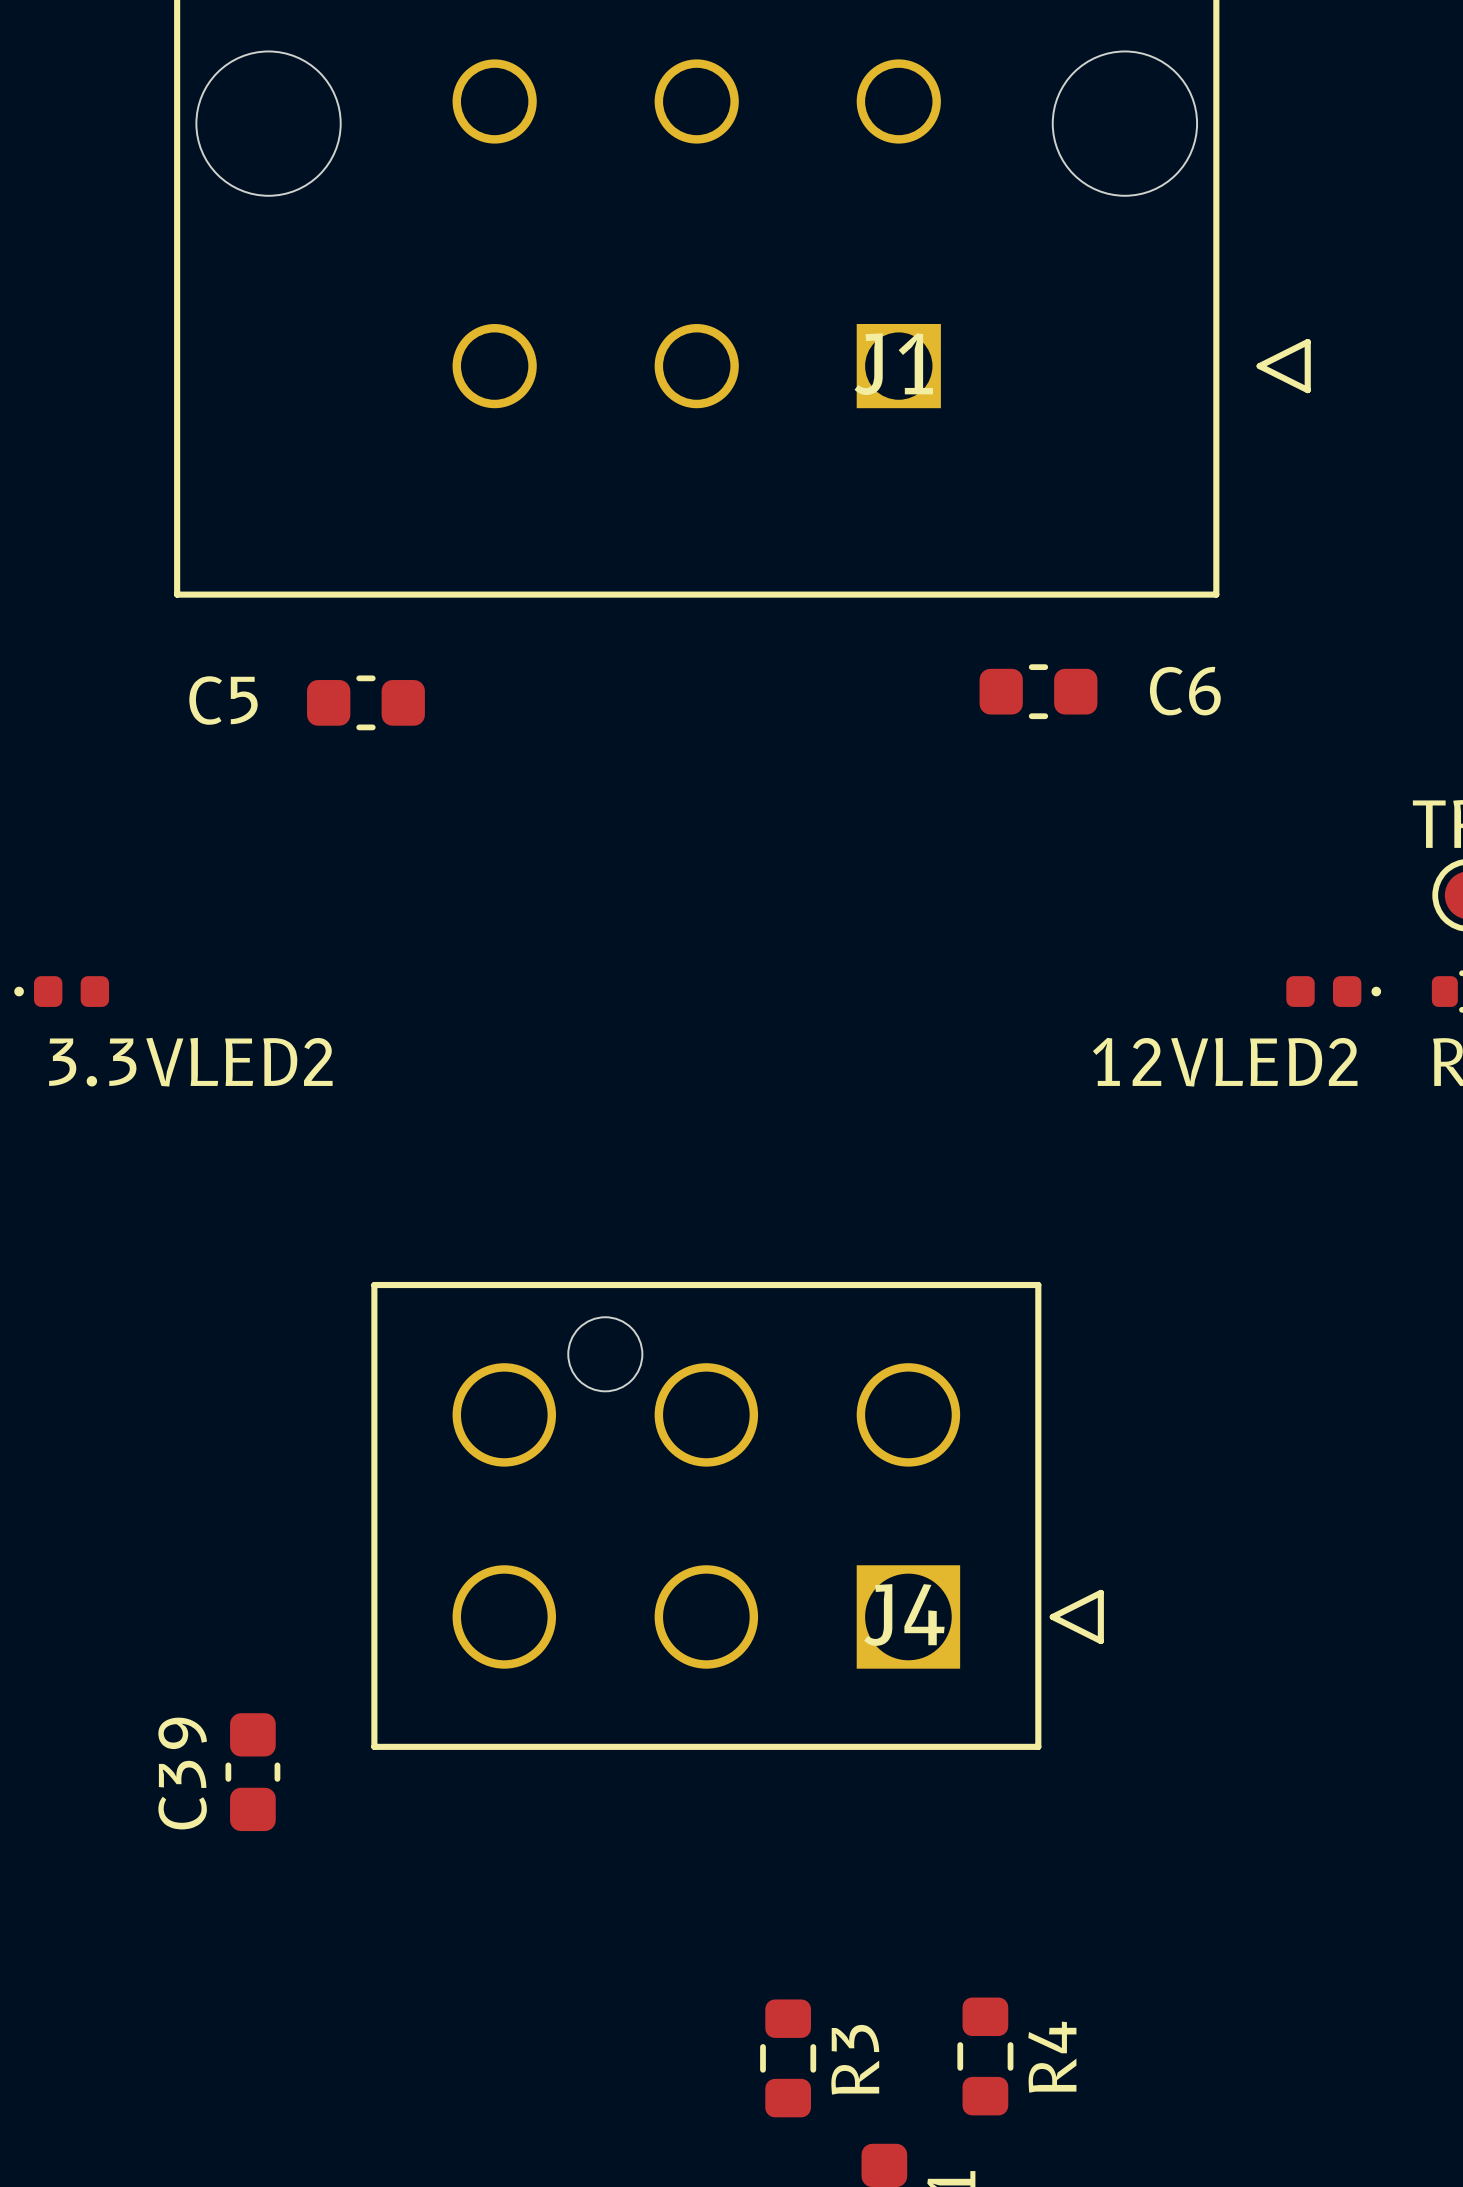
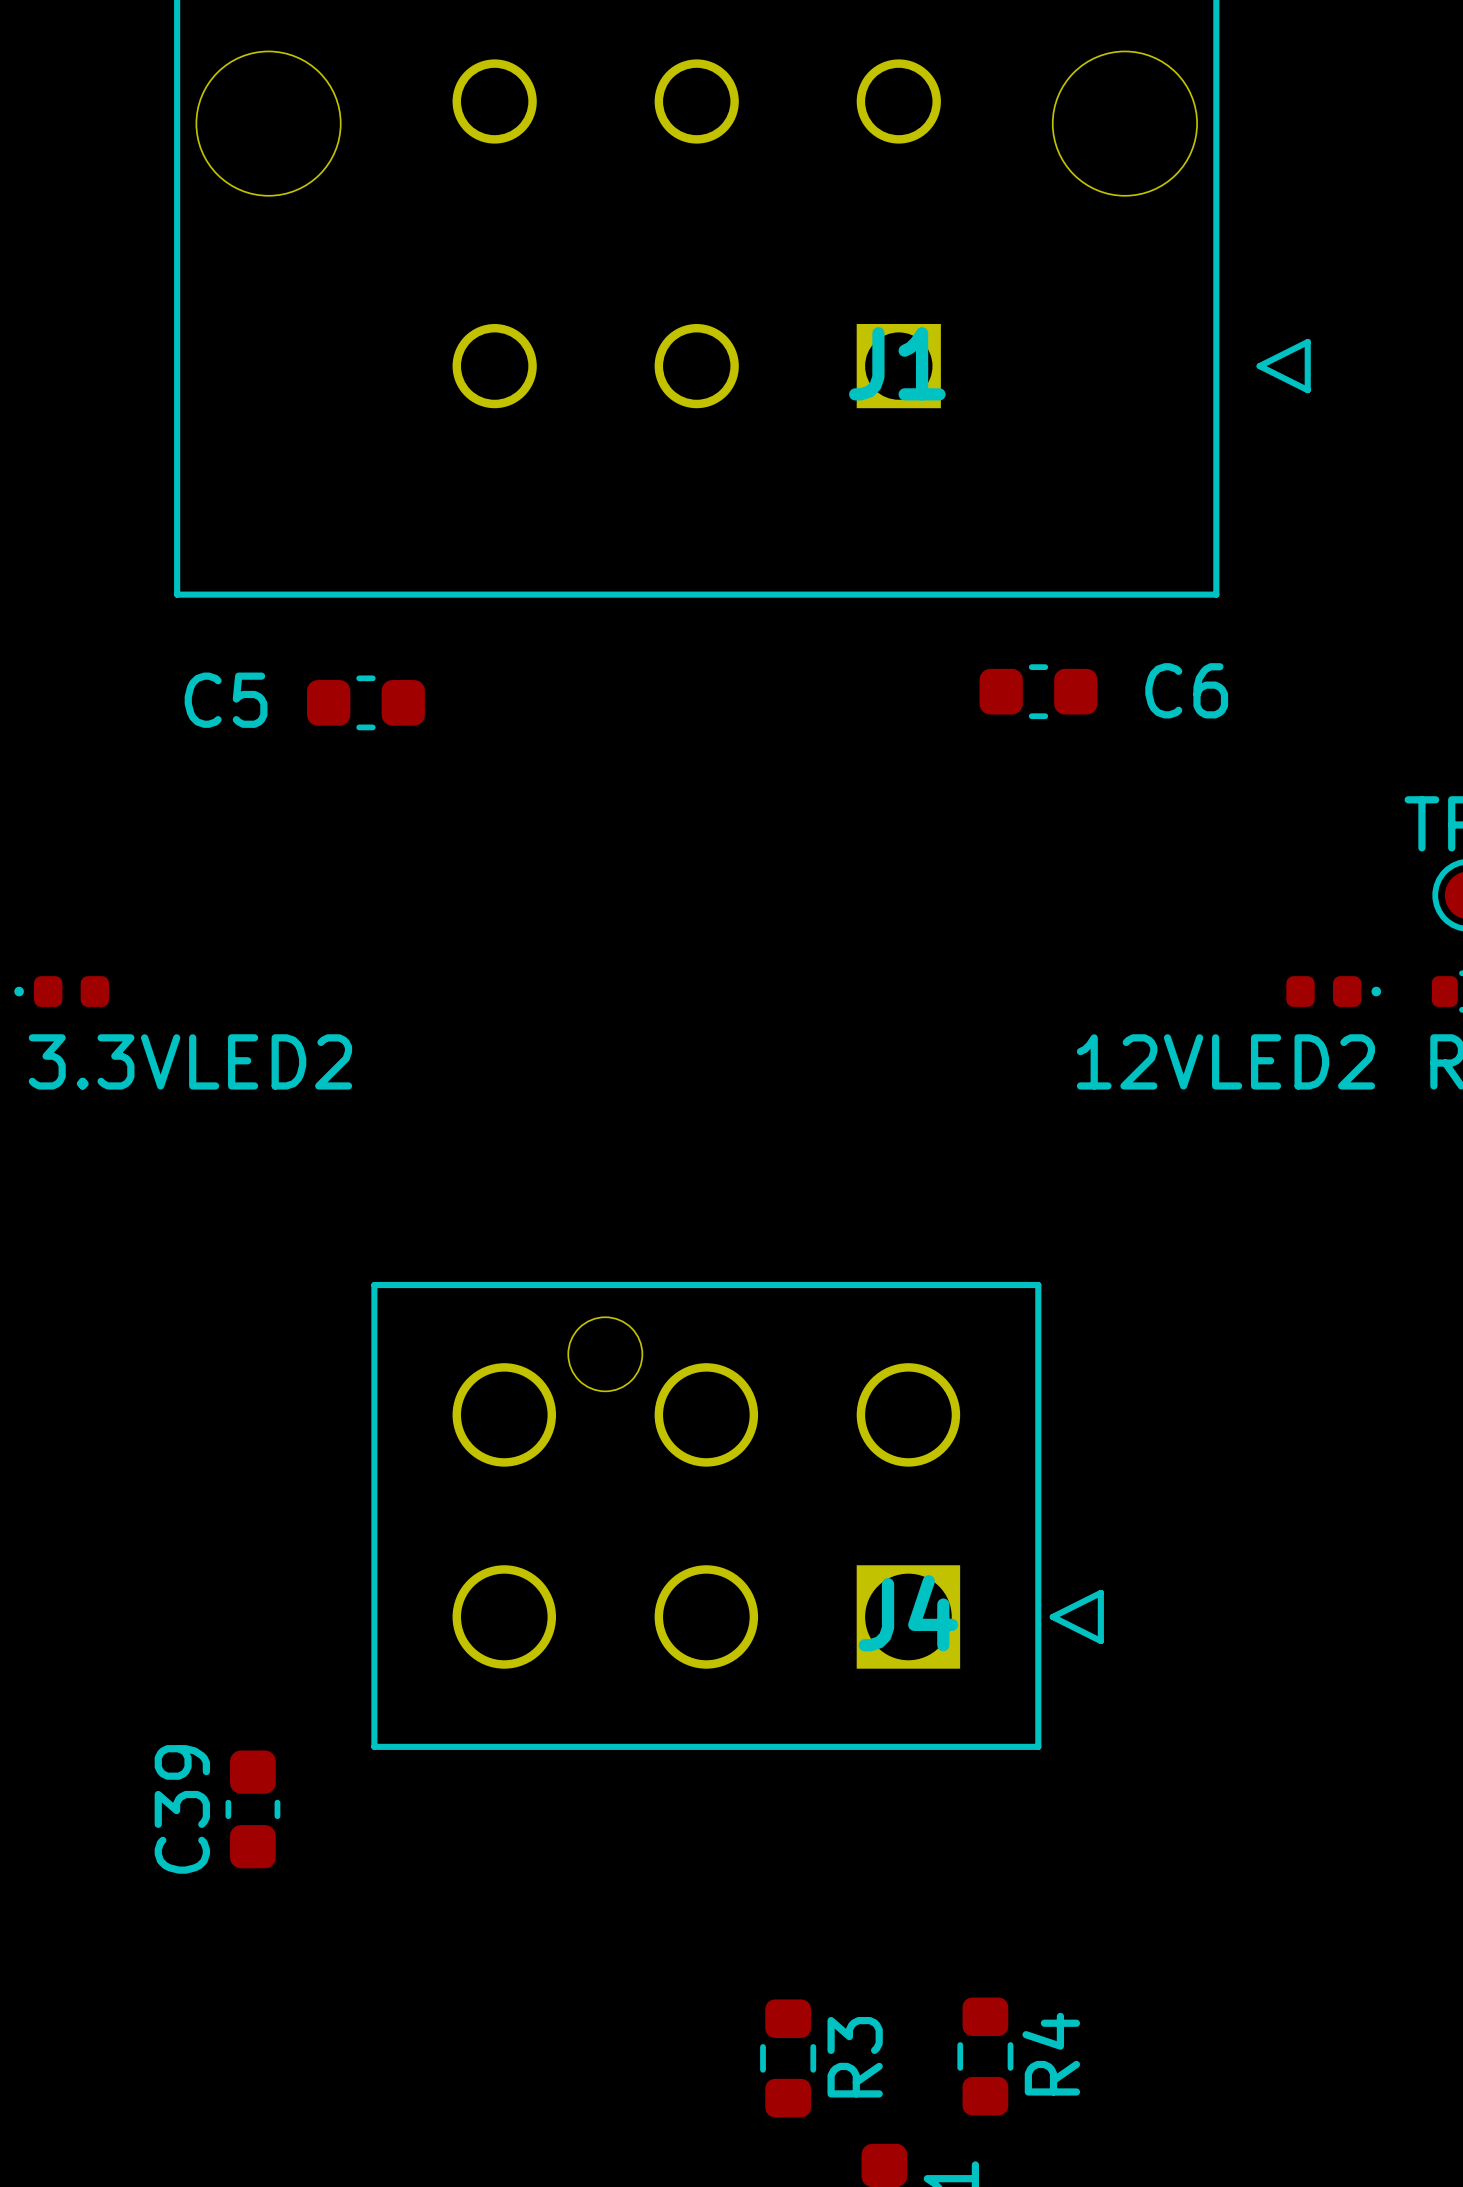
C39 position: (252, 1772) -> (252, 1809)

